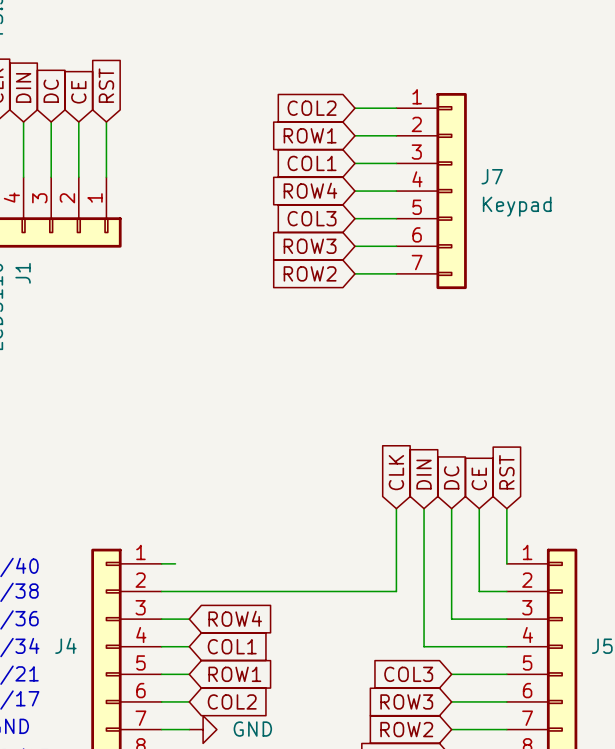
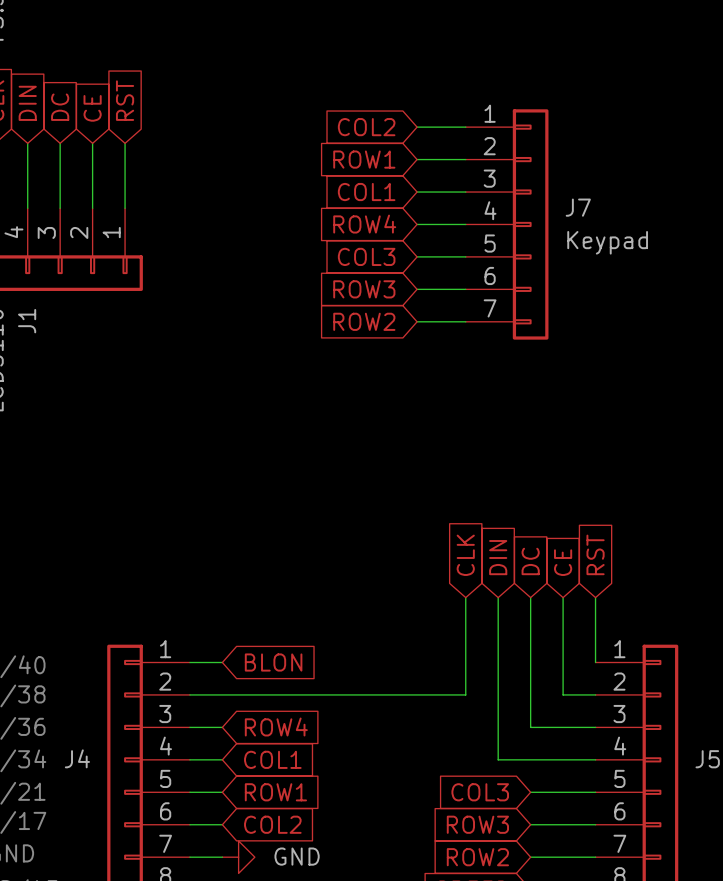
wire: none -> (206, 662) (222, 662)
global label: none -> BLON (273, 662)

